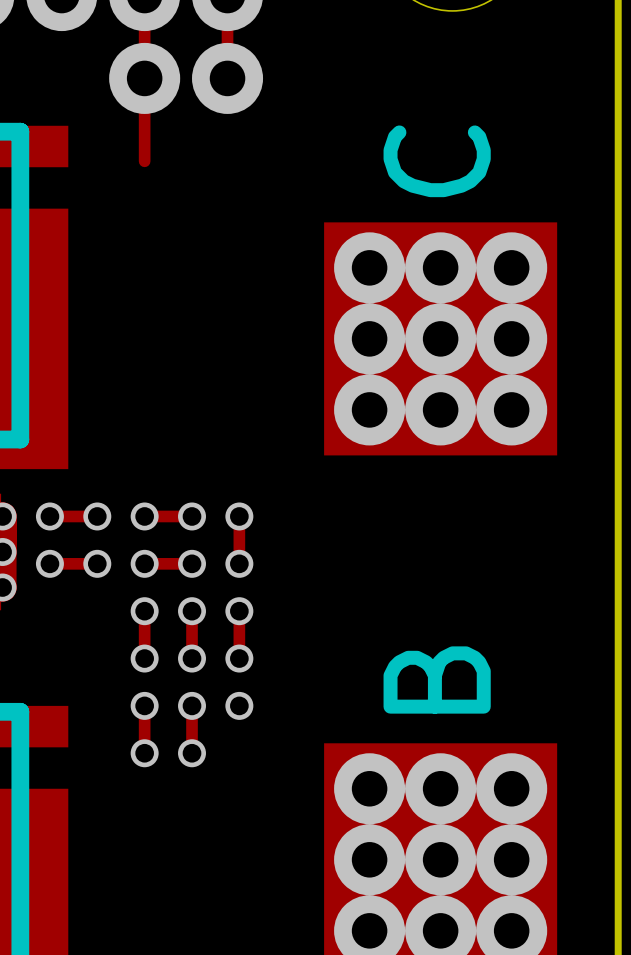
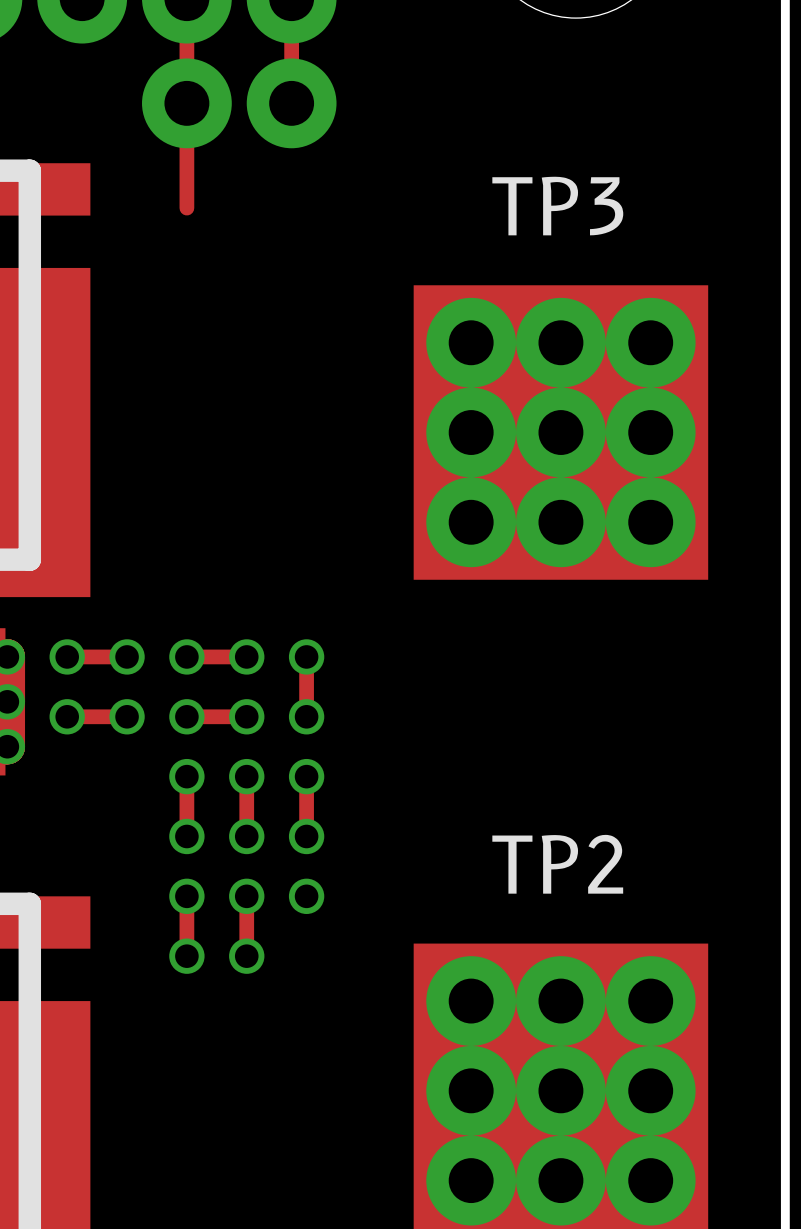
TP3 name: none -> TP3 (557, 206)
text: C (437, 161) -> none
text: B (437, 680) -> none
TP2 name: none -> TP2 (557, 864)

